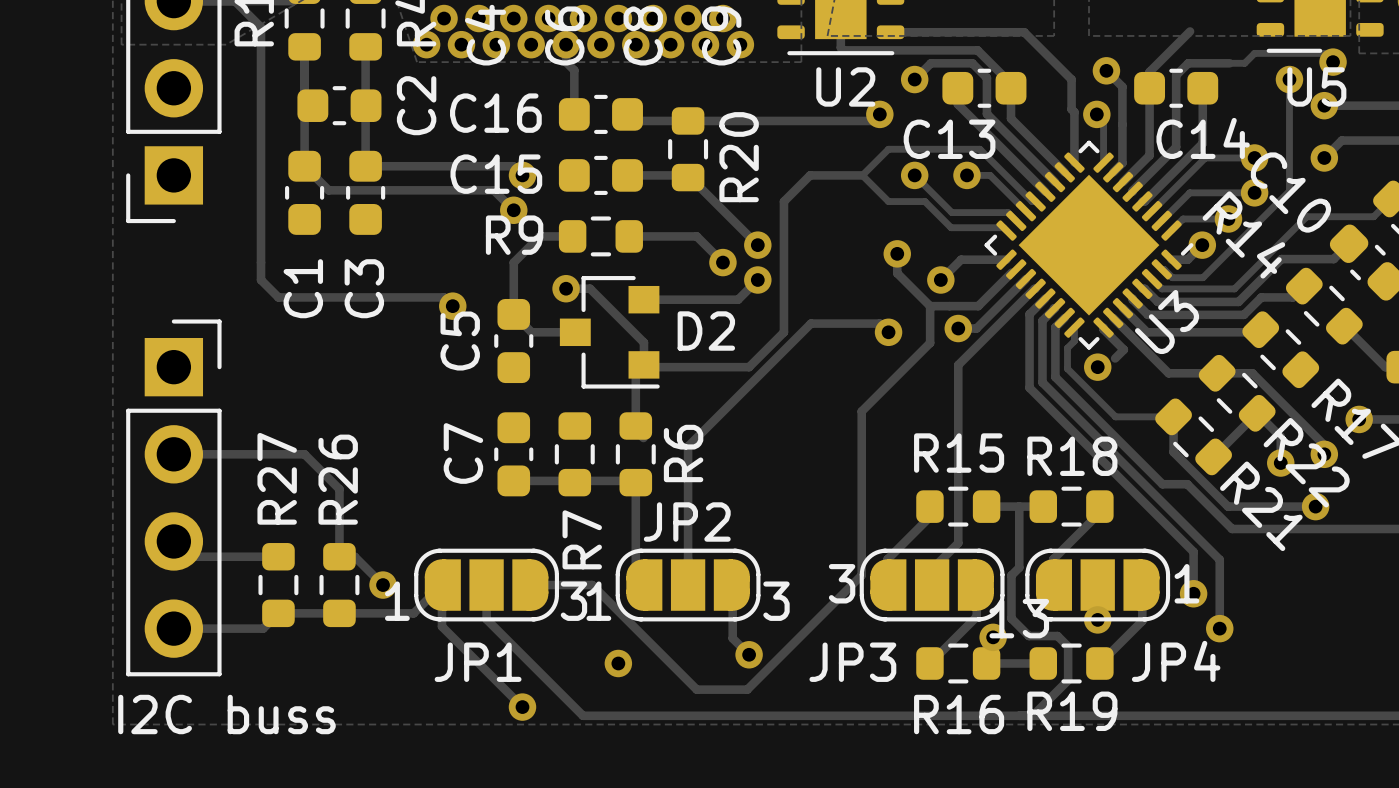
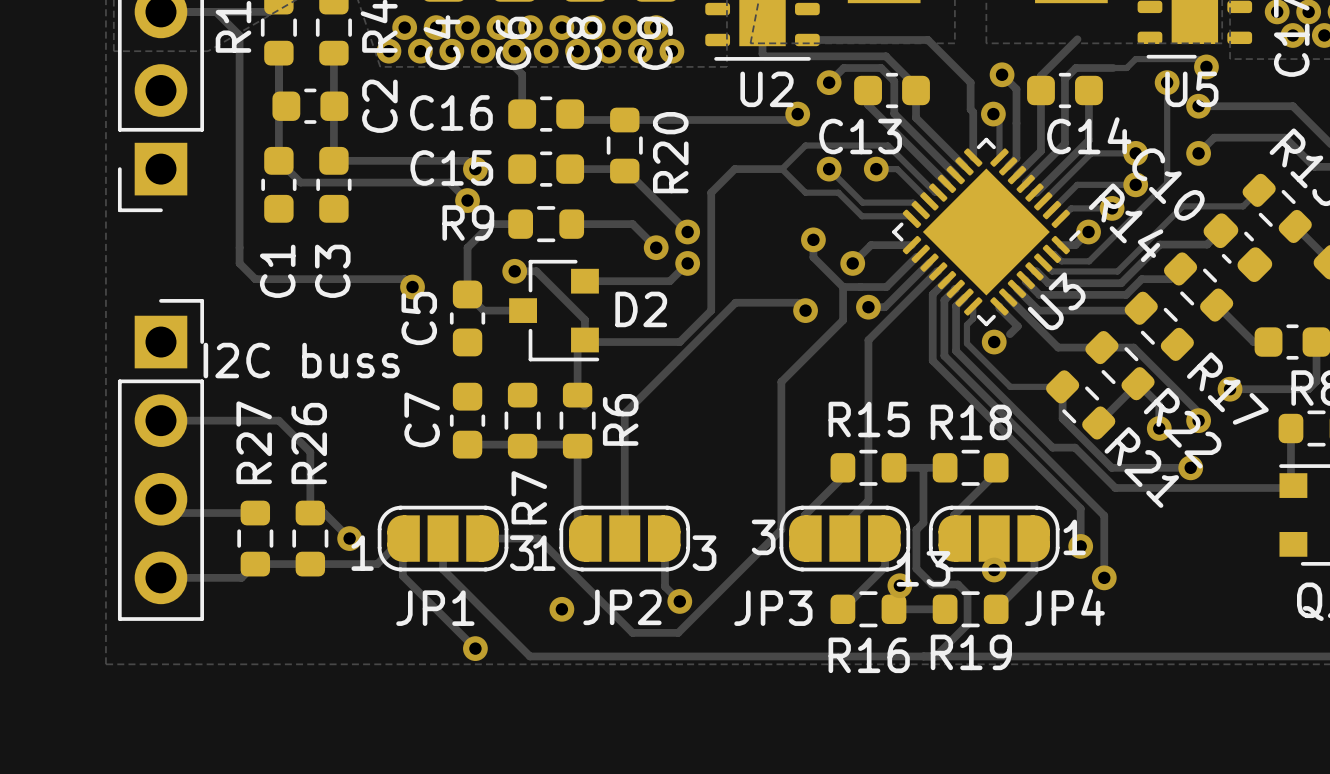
JP2 name position: JP2 (687, 522) -> JP2 (622, 607)
part value position: I2C buss (226, 714) -> I2C buss (301, 360)

